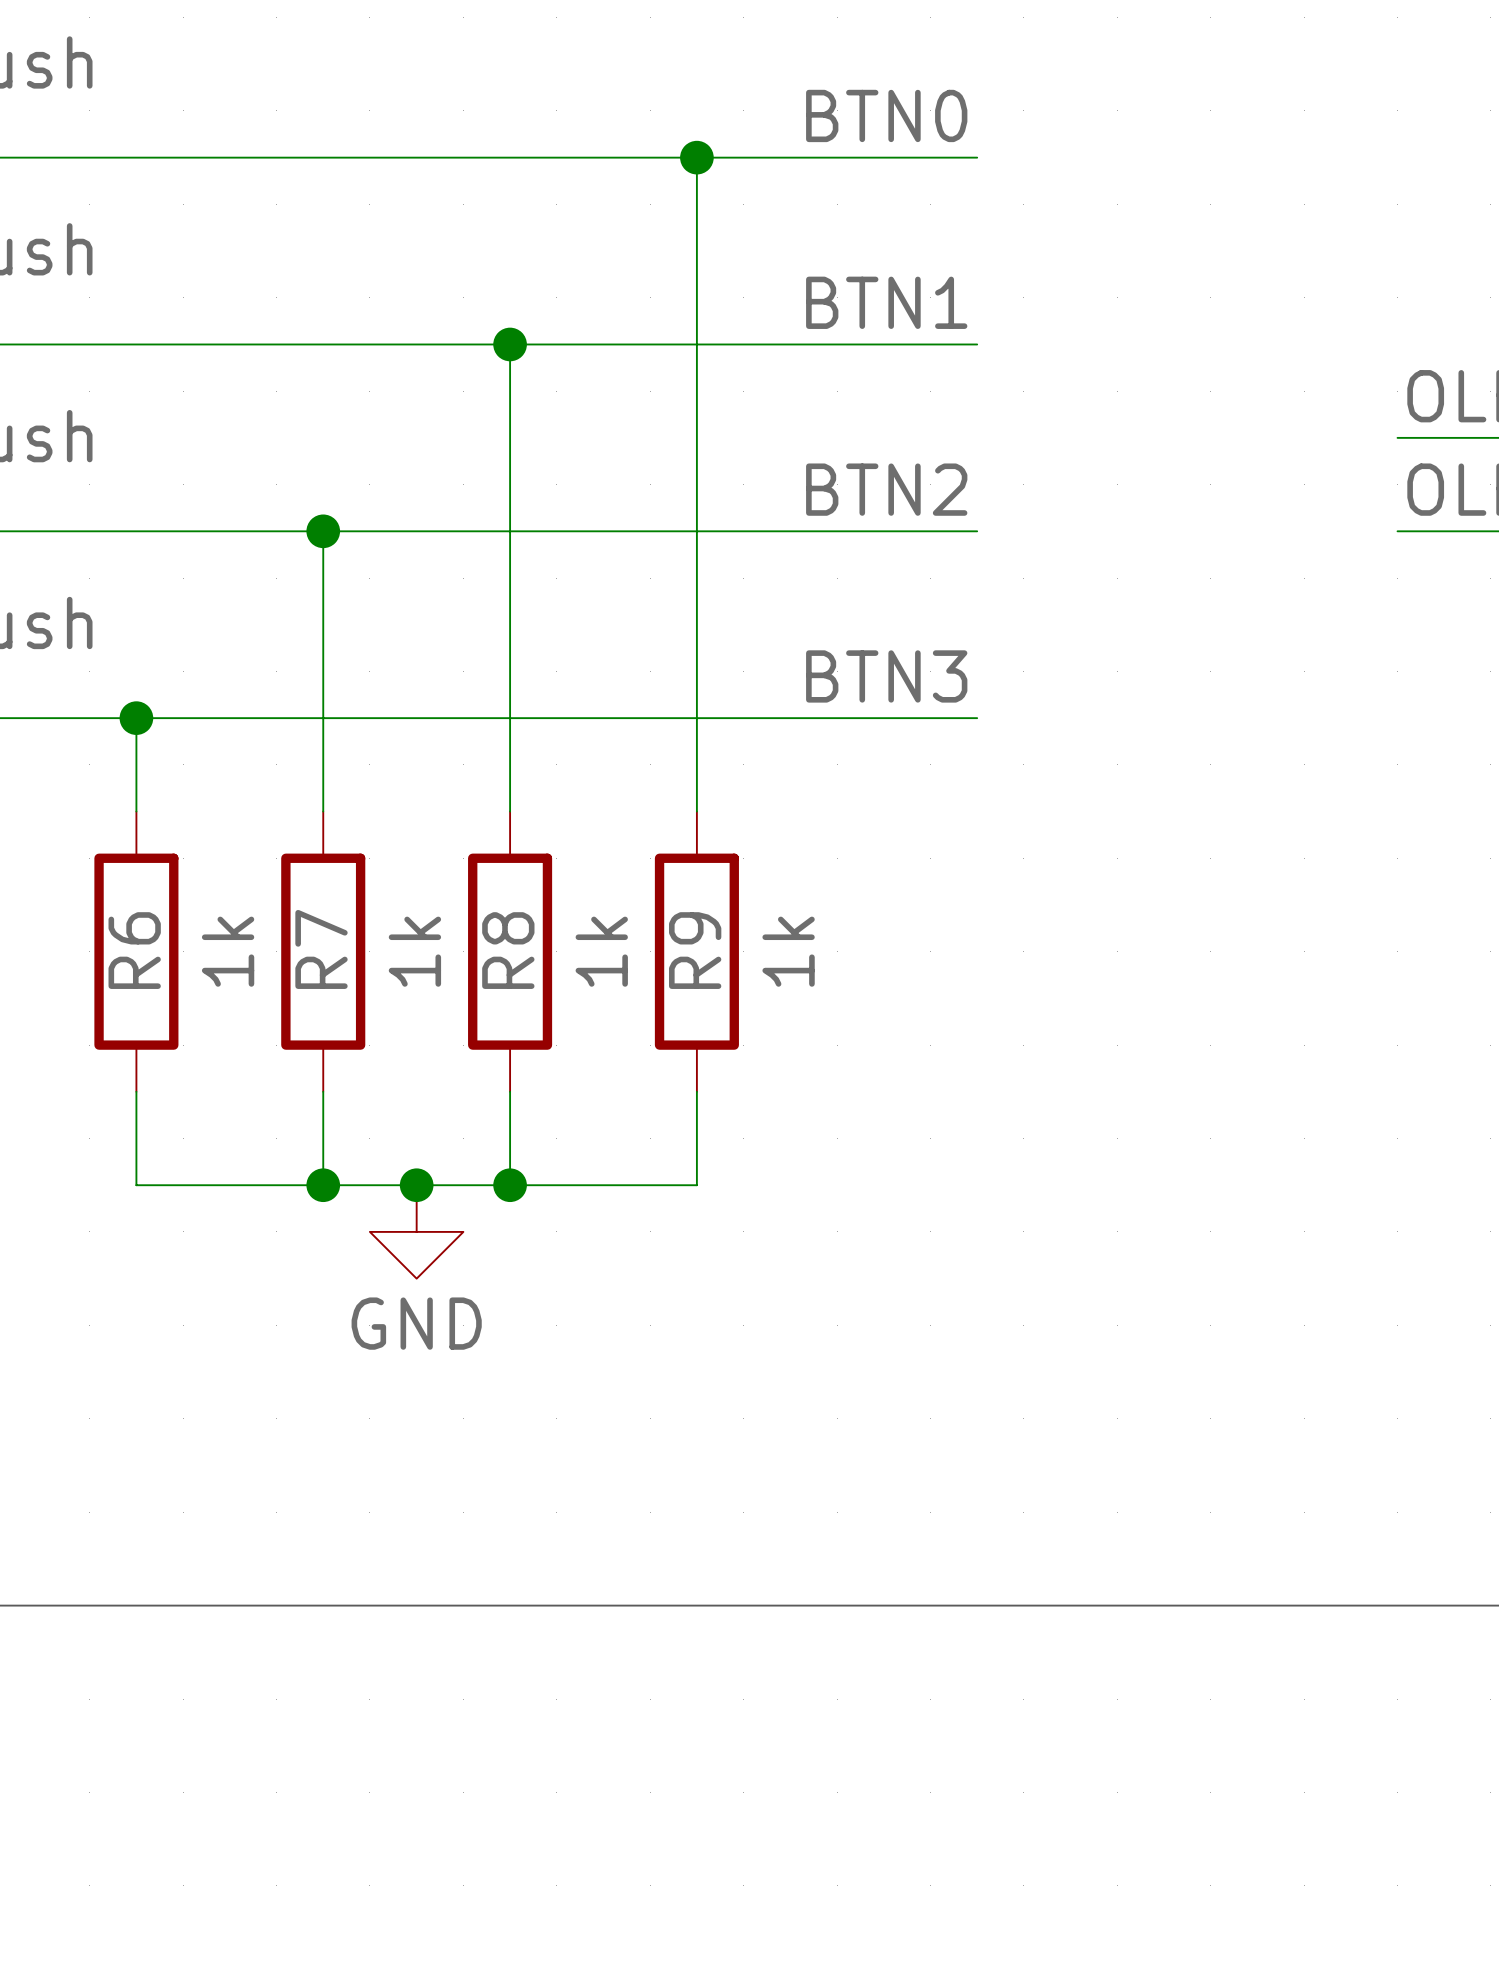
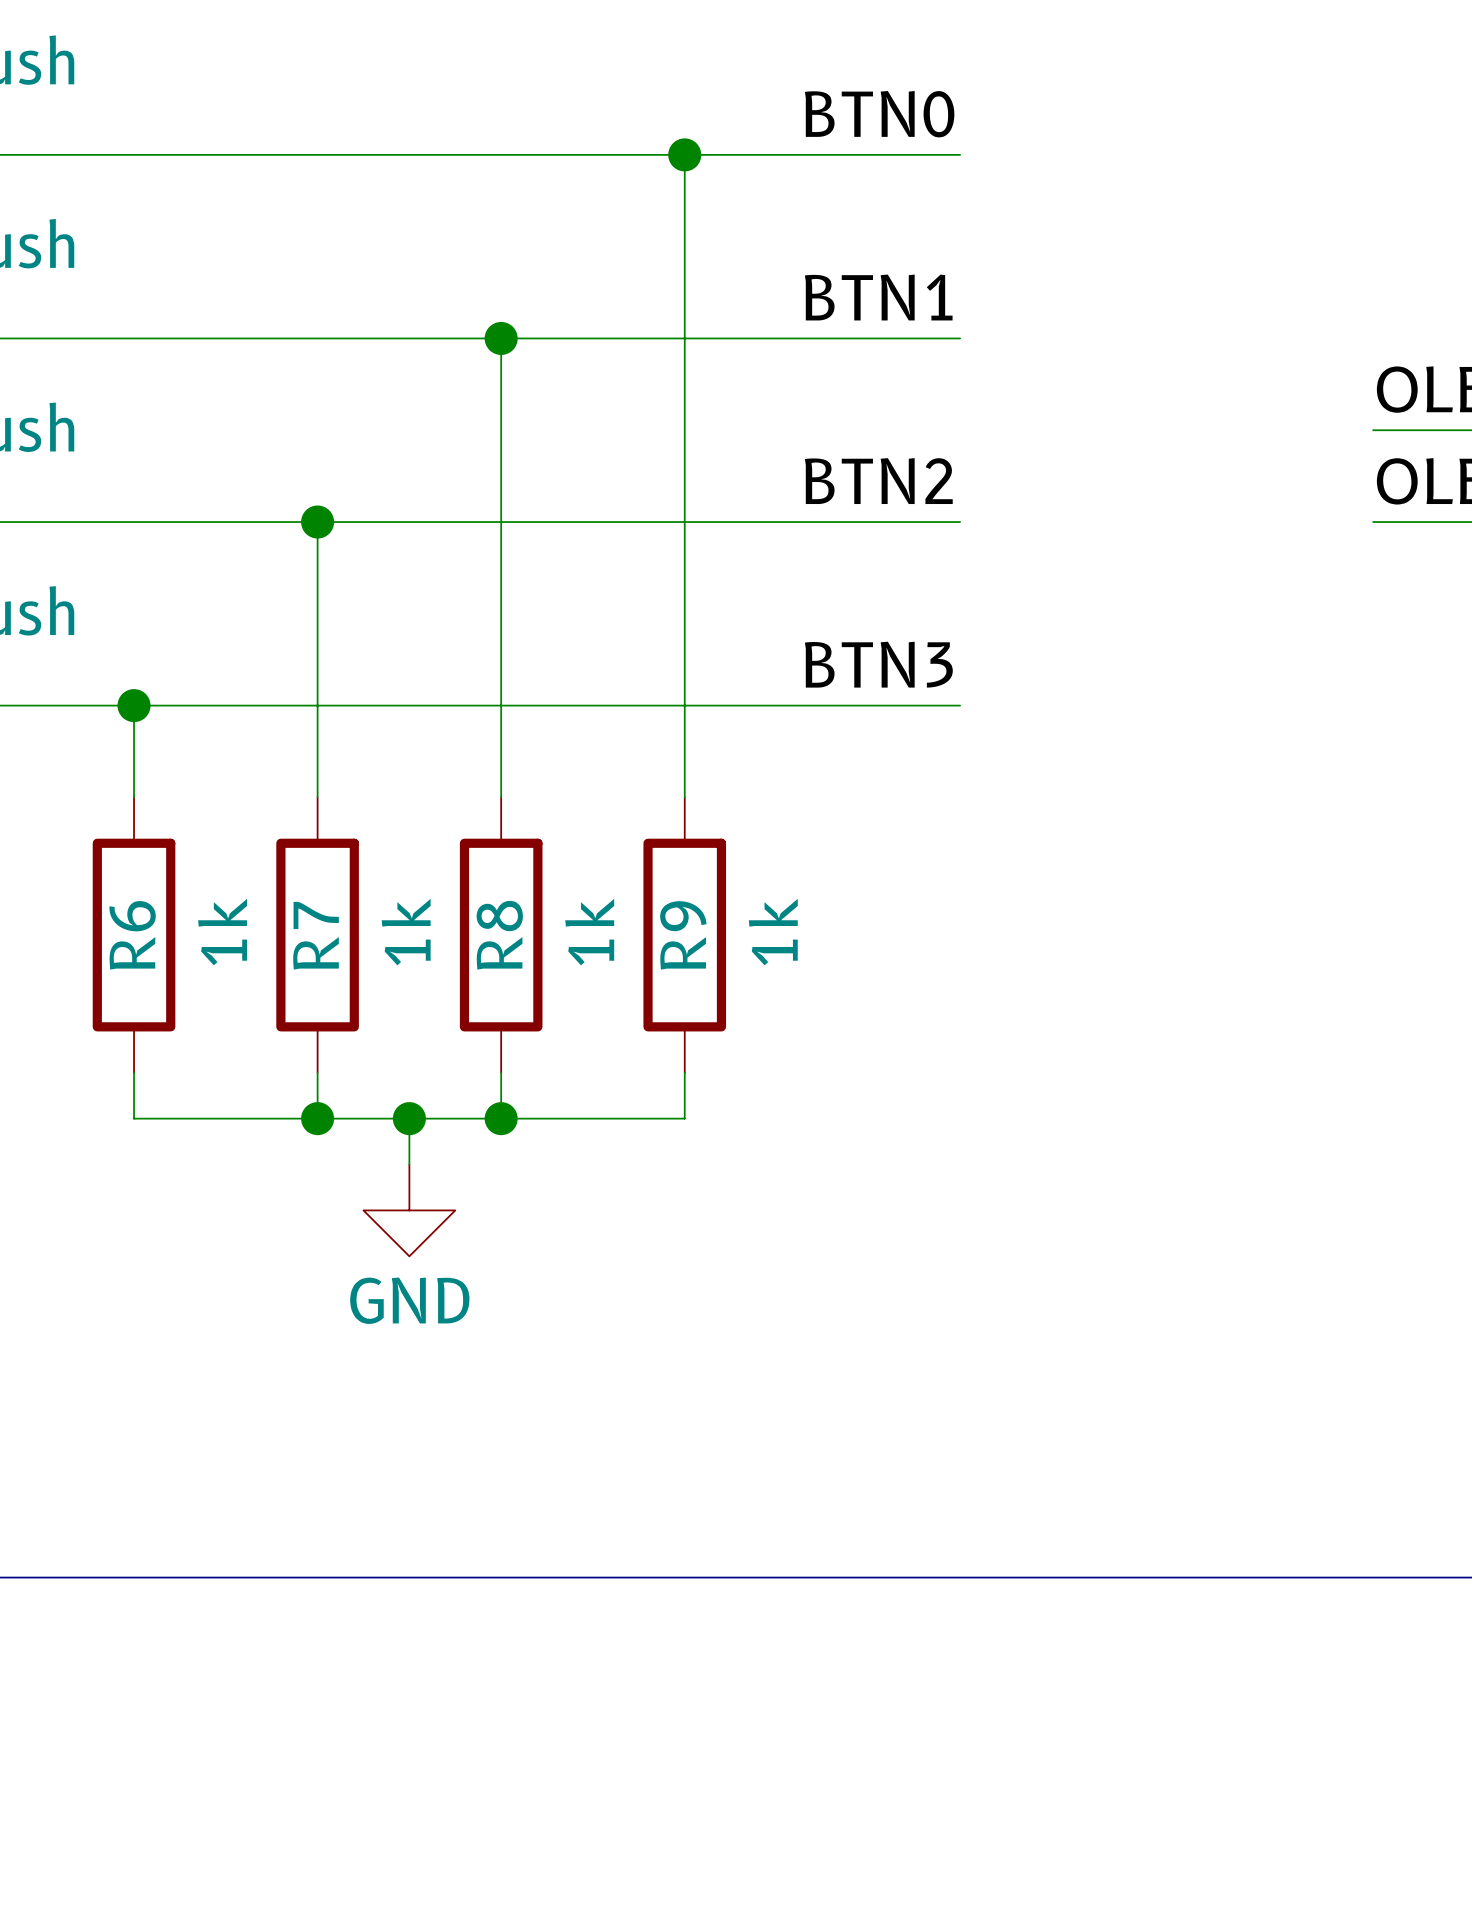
wire: (136, 1138) (136, 1185) (696, 1185) (696, 1138) -> (134, 1118) (684, 1118)
wire: (323, 1138) (323, 1185) -> (409, 1118) (409, 1164)
wire: (510, 1138) (510, 1185) -> none
junction position: (323, 1185) -> (317, 1118)
junction position: (416, 1185) -> (409, 1118)
junction position: (510, 1185) -> (501, 1118)

